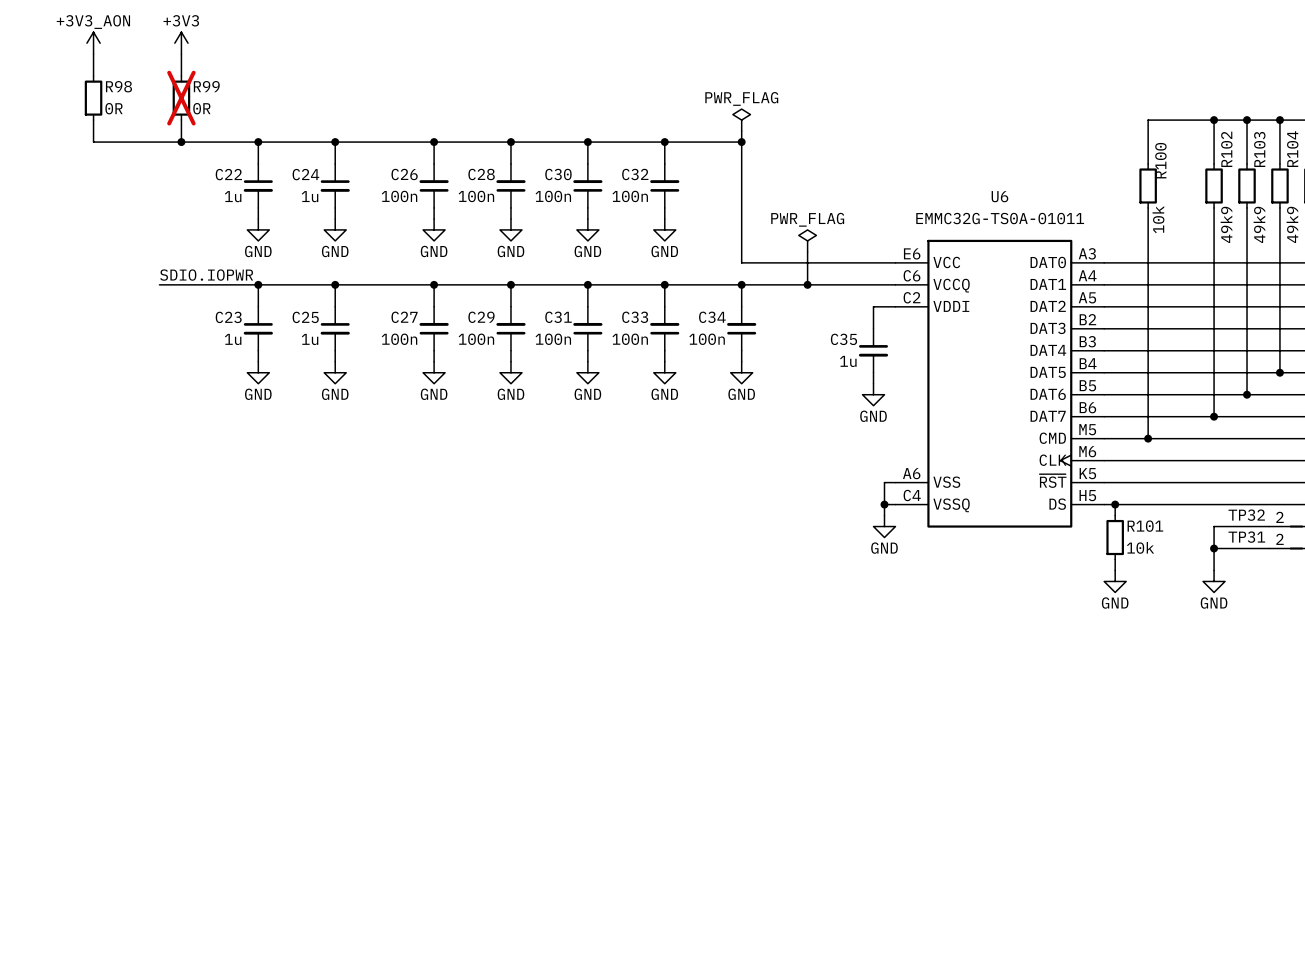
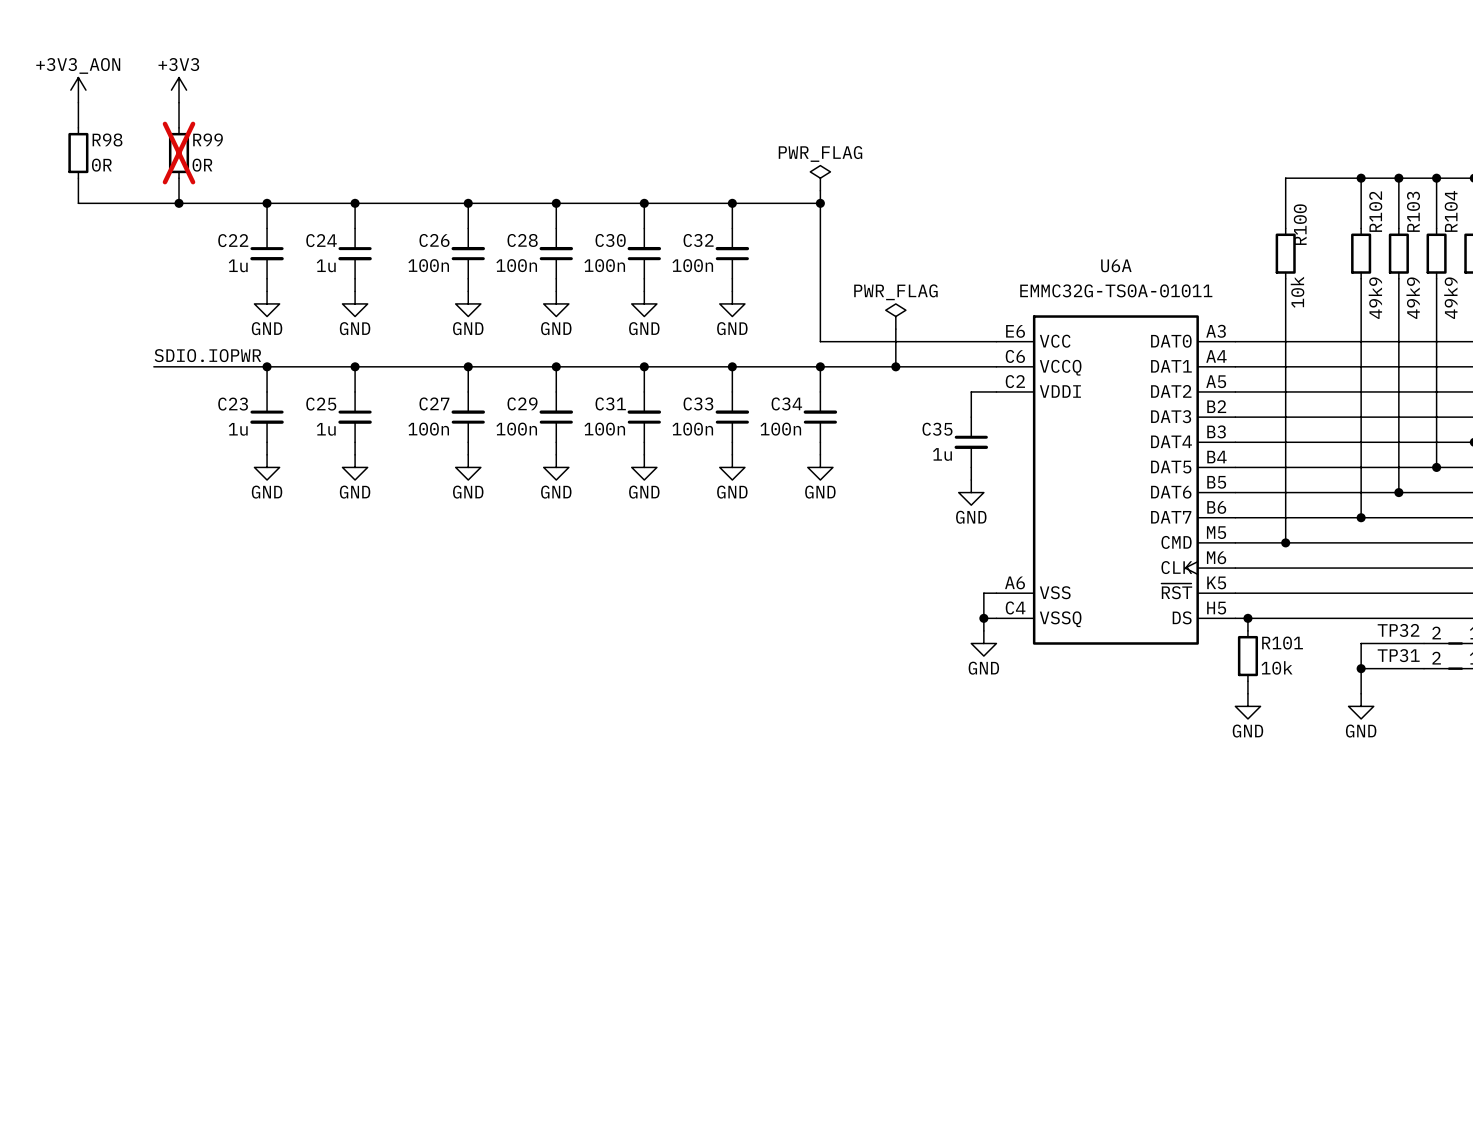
U6 name: U6 (999, 196) -> U6A (1116, 265)

